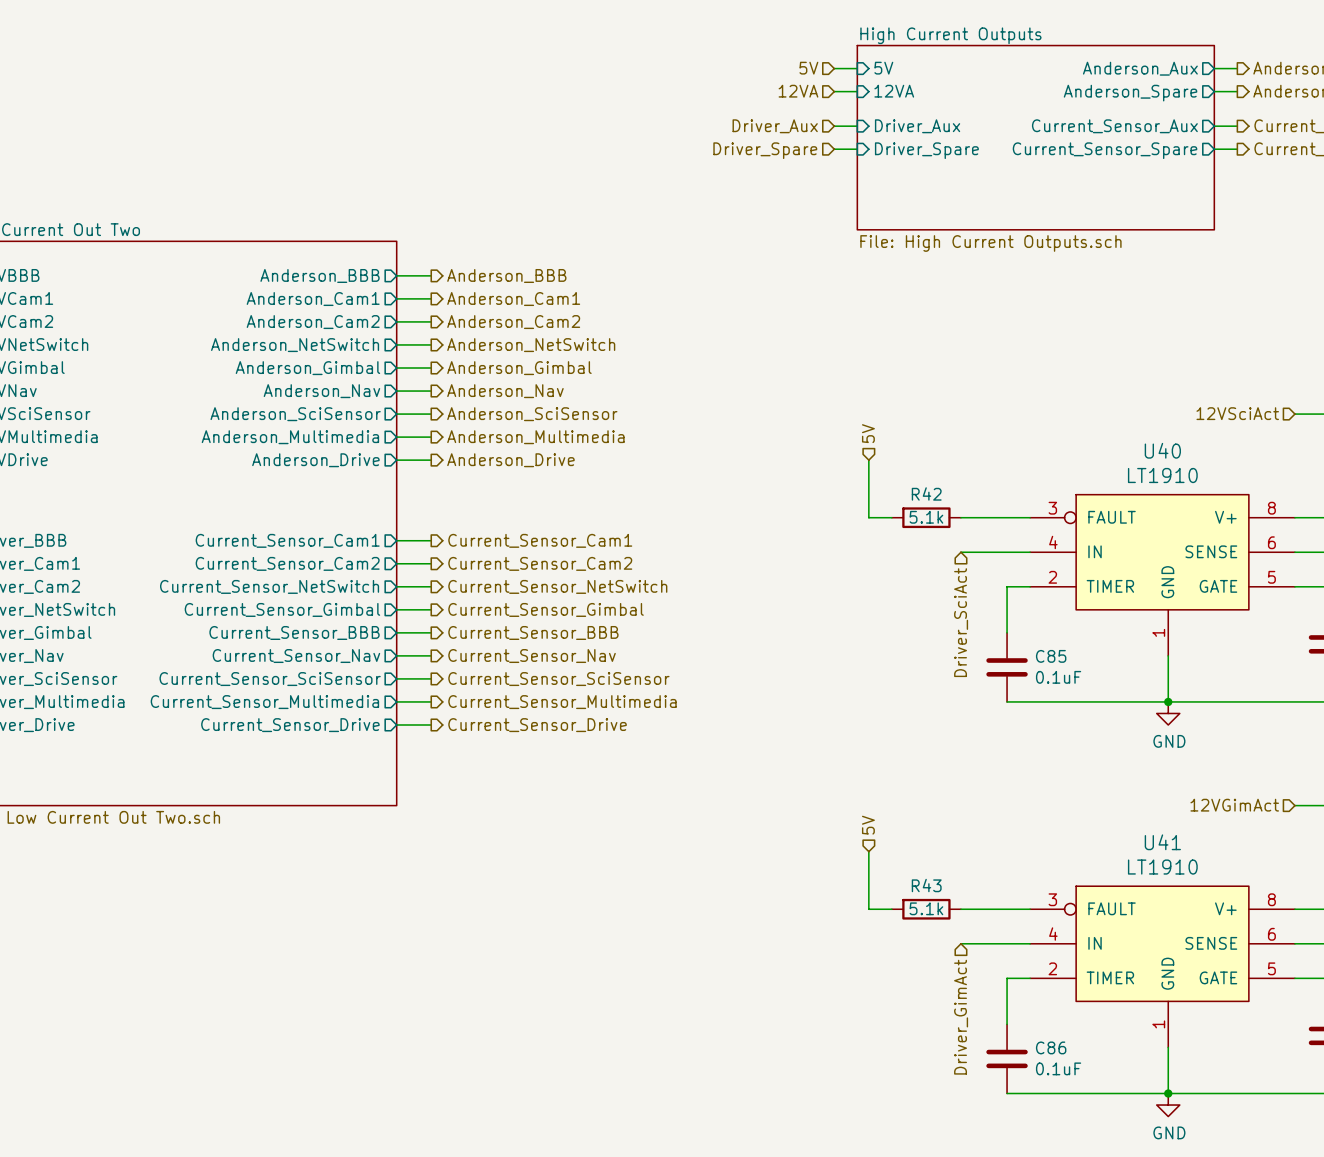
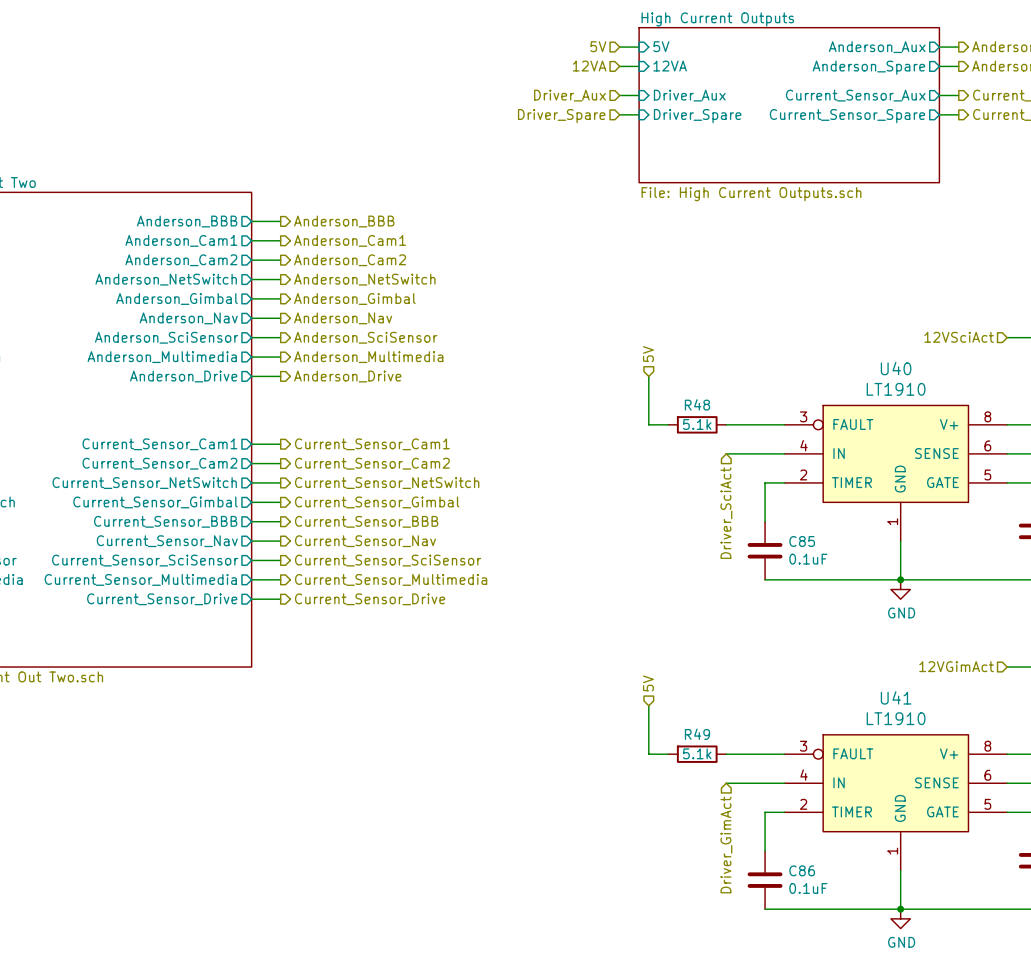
R42 name: R42 (926, 493) -> R48 (697, 404)
R43 name: R43 (926, 885) -> R49 (697, 734)

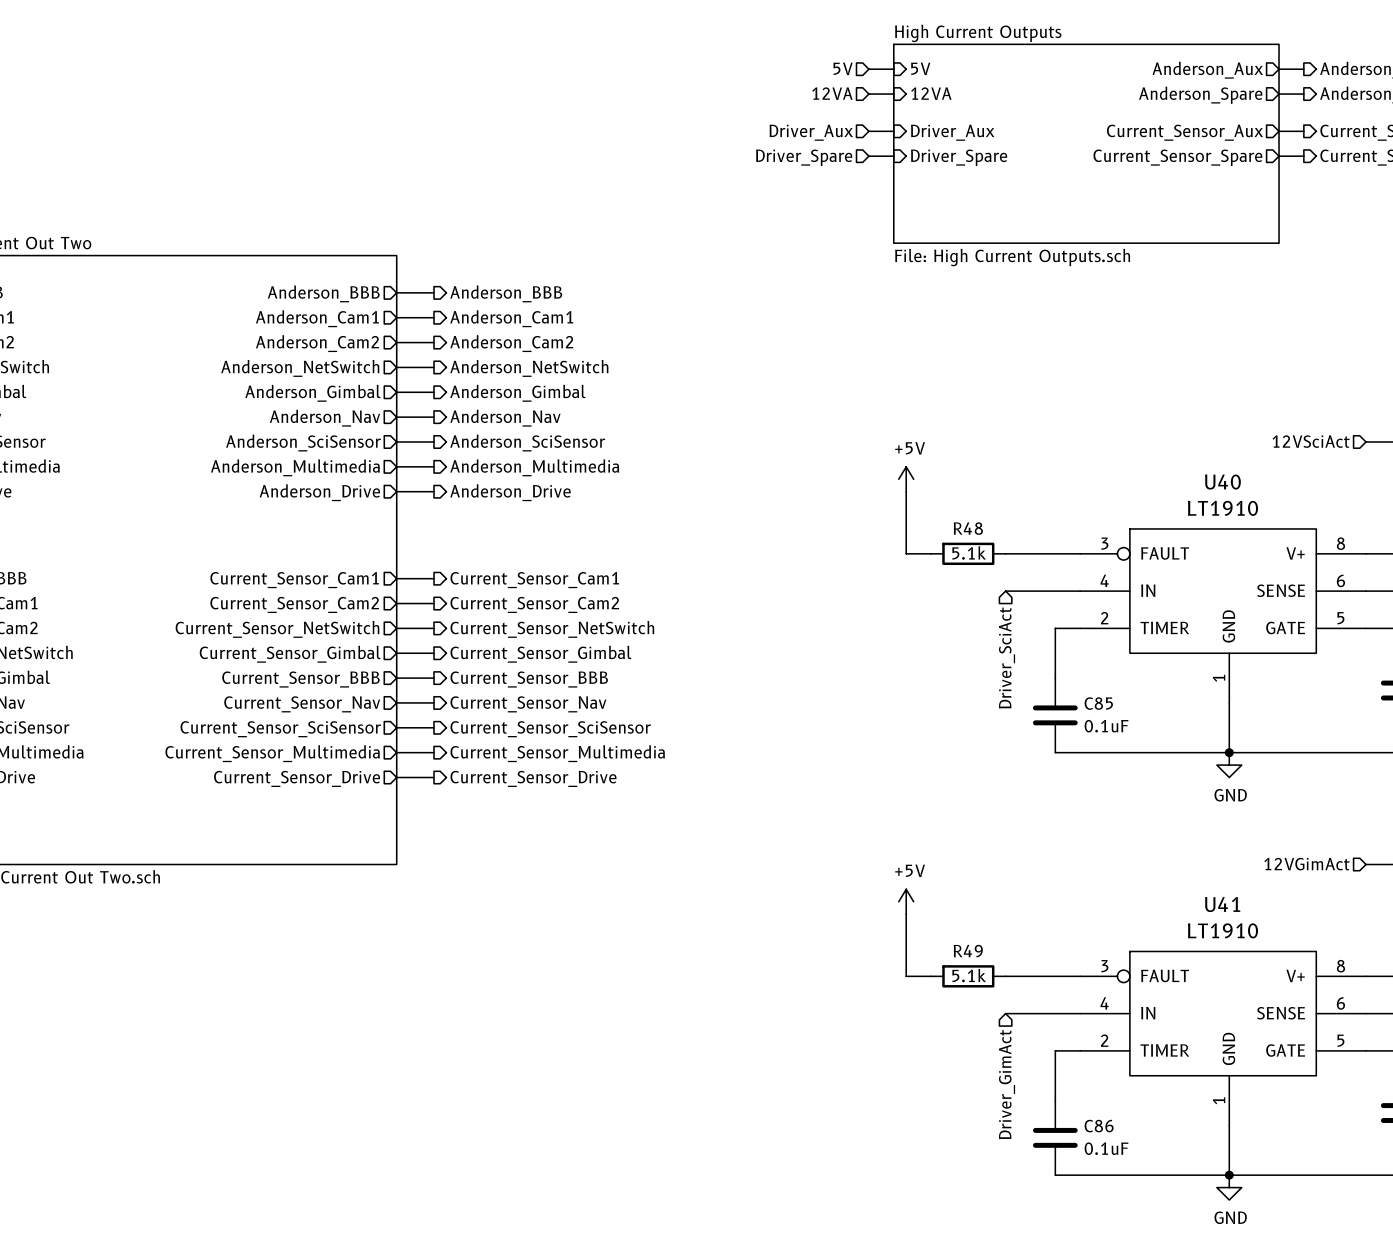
hierarchical label: 5V (648, 354) -> none
power symbol: none -> +5V (906, 479)
hierarchical label: 5V (648, 683) -> none
power symbol: none -> +5V (906, 901)

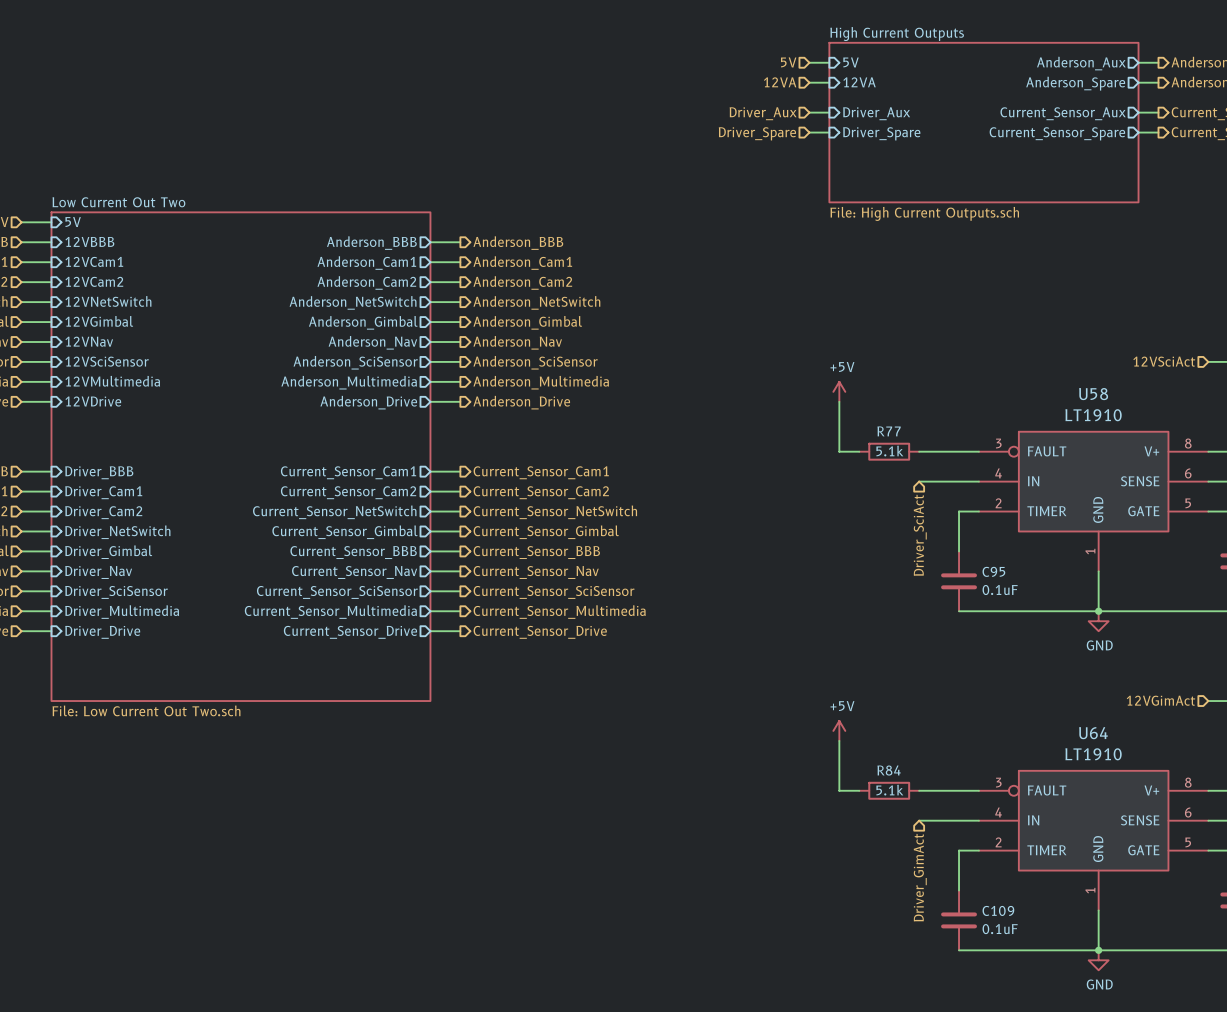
U40 name: U40 (1222, 482) -> U58 (1093, 394)
R48 name: R48 (968, 528) -> R77 (889, 431)
C85 name: C85 (1098, 703) -> C95 (993, 571)
U41 name: U41 (1222, 904) -> U64 (1093, 733)
R49 name: R49 (968, 951) -> R84 (889, 770)
C86 name: C86 (1099, 1126) -> C109 (998, 910)

